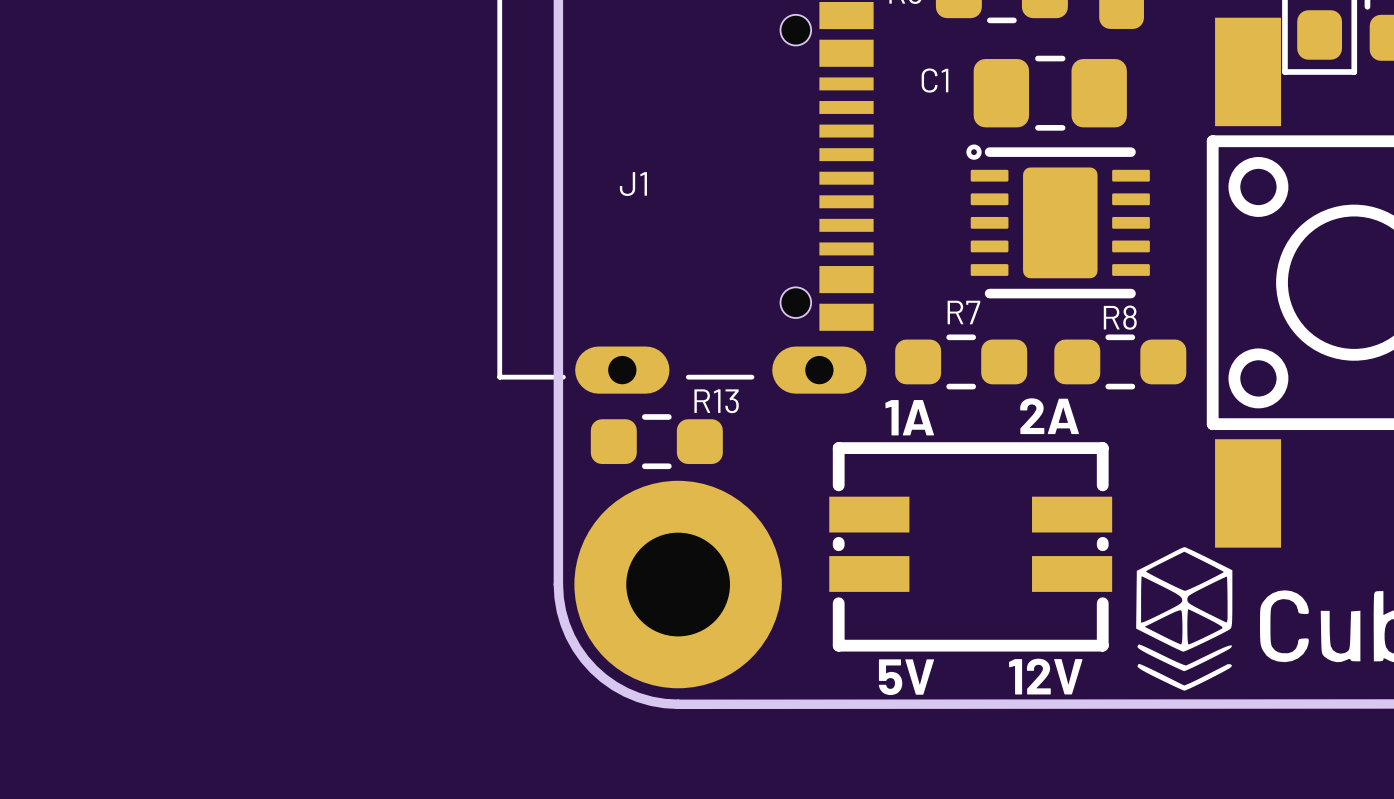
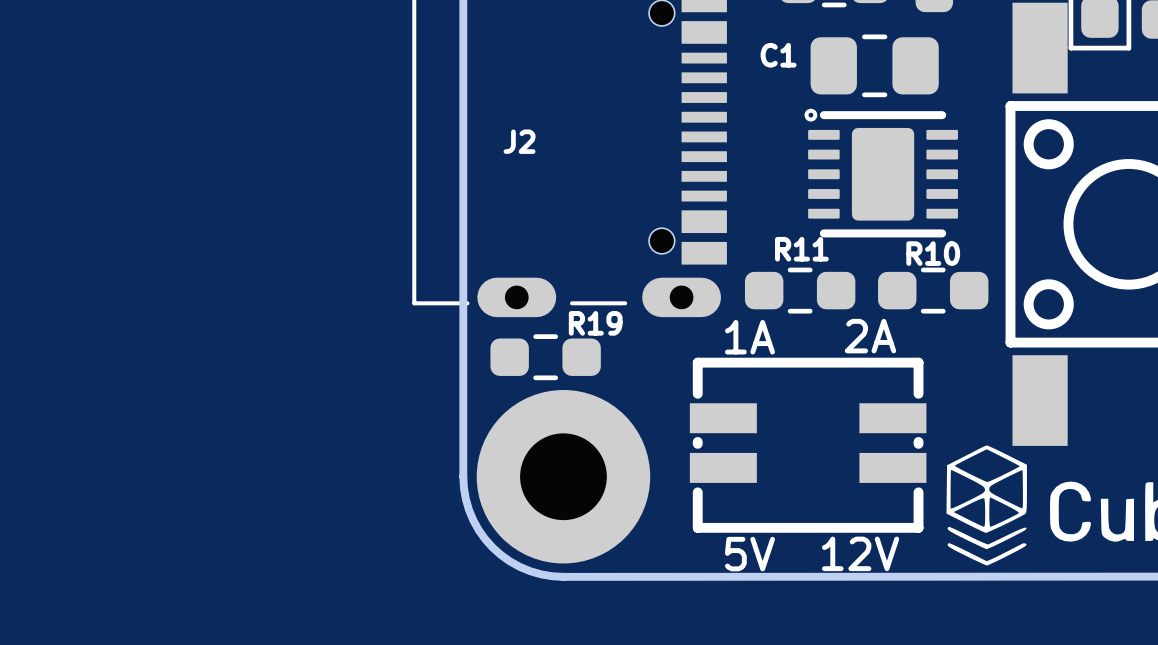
J1 name: J1 (633, 184) -> J2 (519, 141)
R7 name: R7 (963, 312) -> R11 (801, 249)
R8 name: R8 (1120, 317) -> R10 (933, 253)
R13 name: R13 (716, 401) -> R19 (595, 323)

